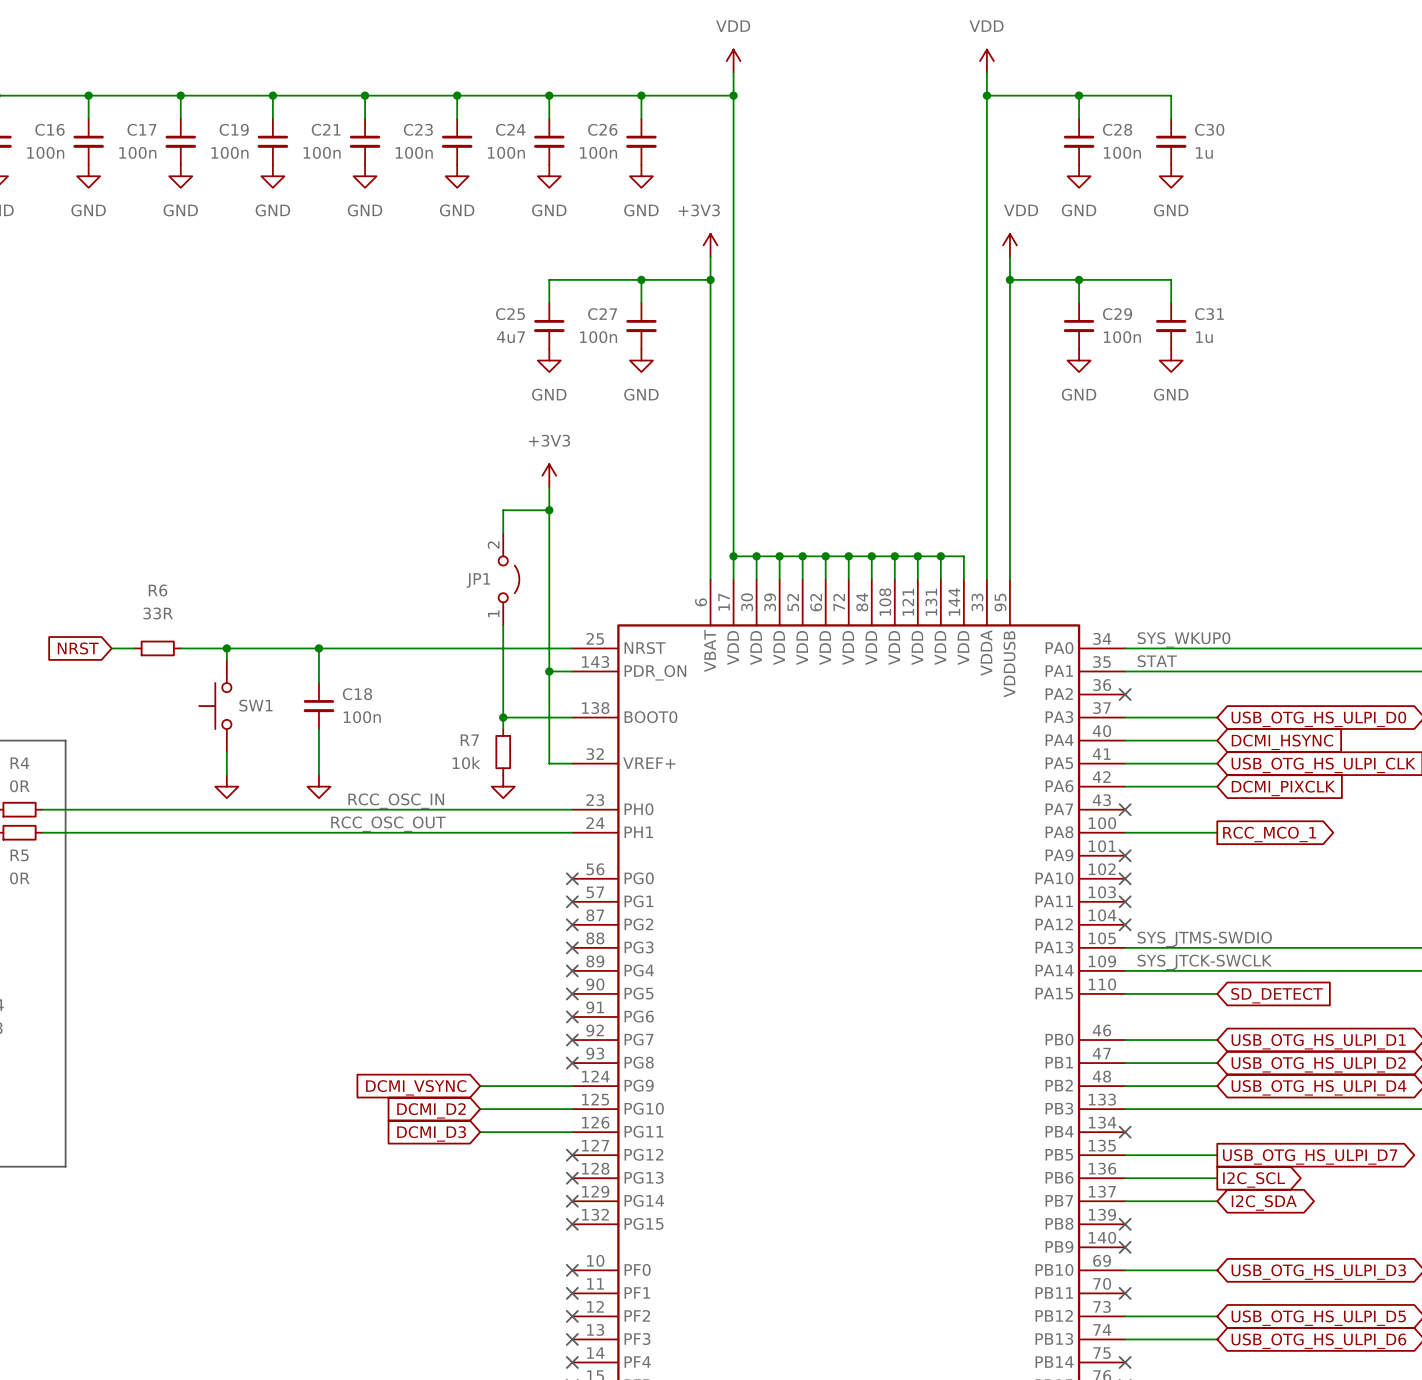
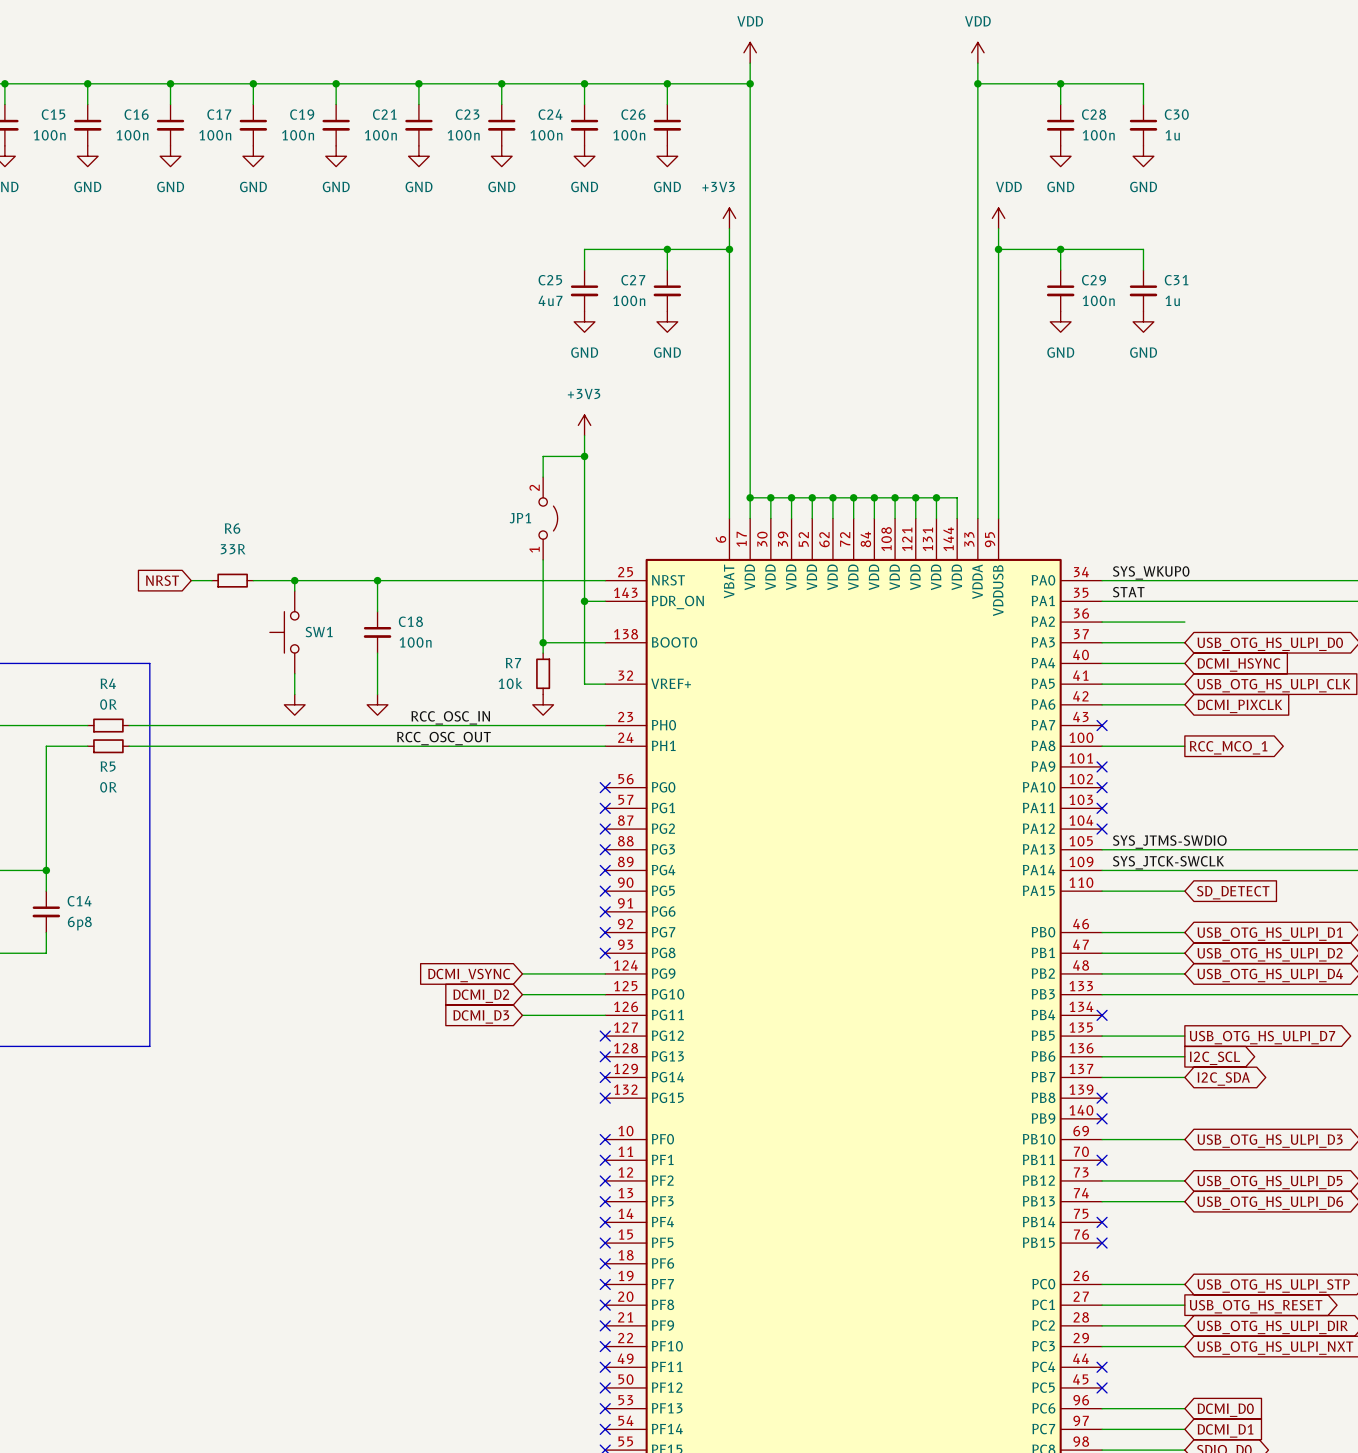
wire: none -> (1102, 622) (1184, 622)
no-connect mark: (1125, 694) -> none

